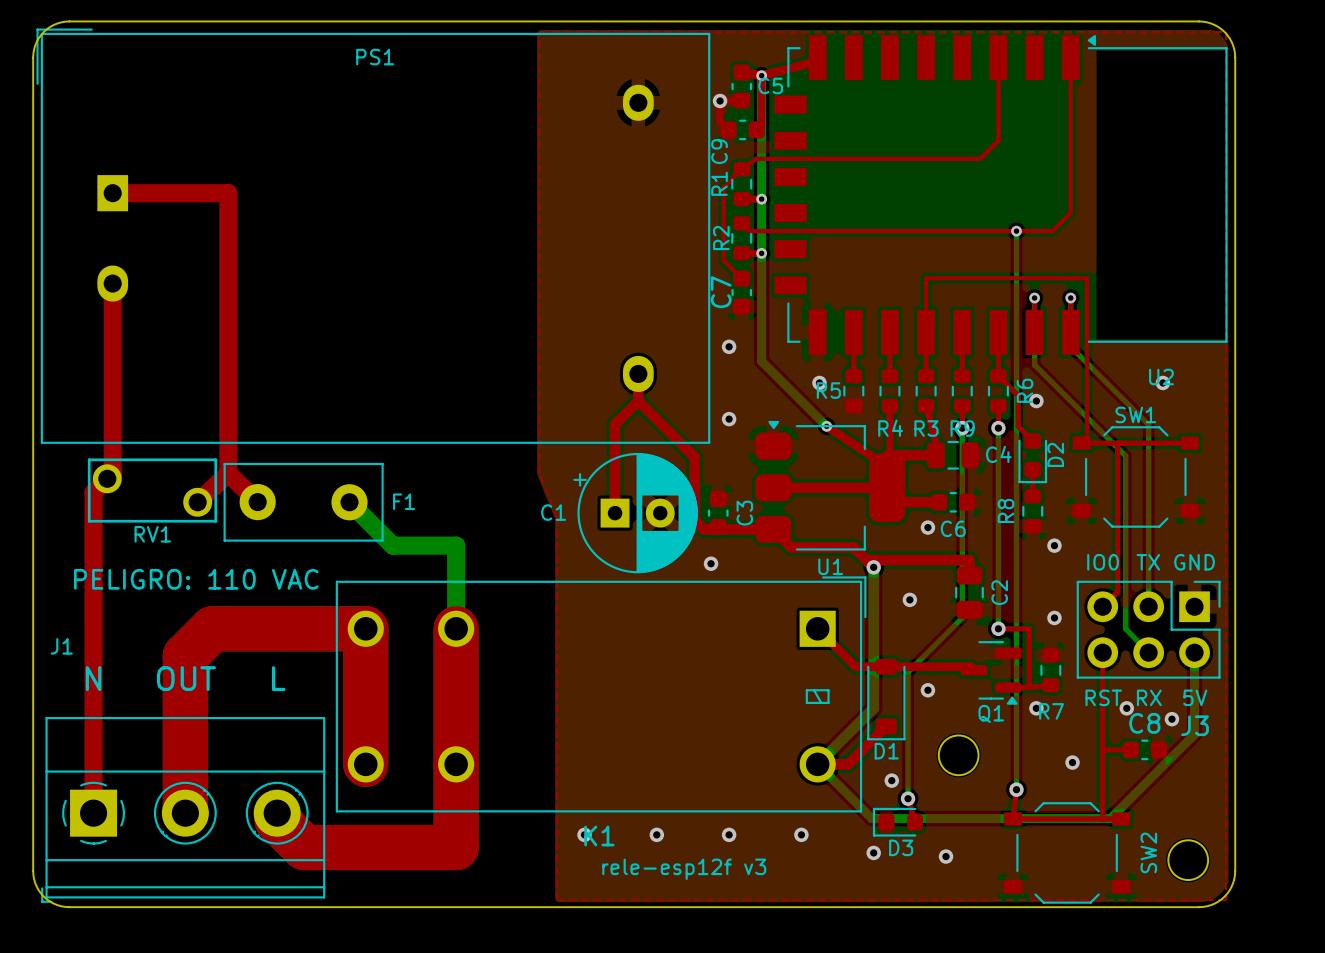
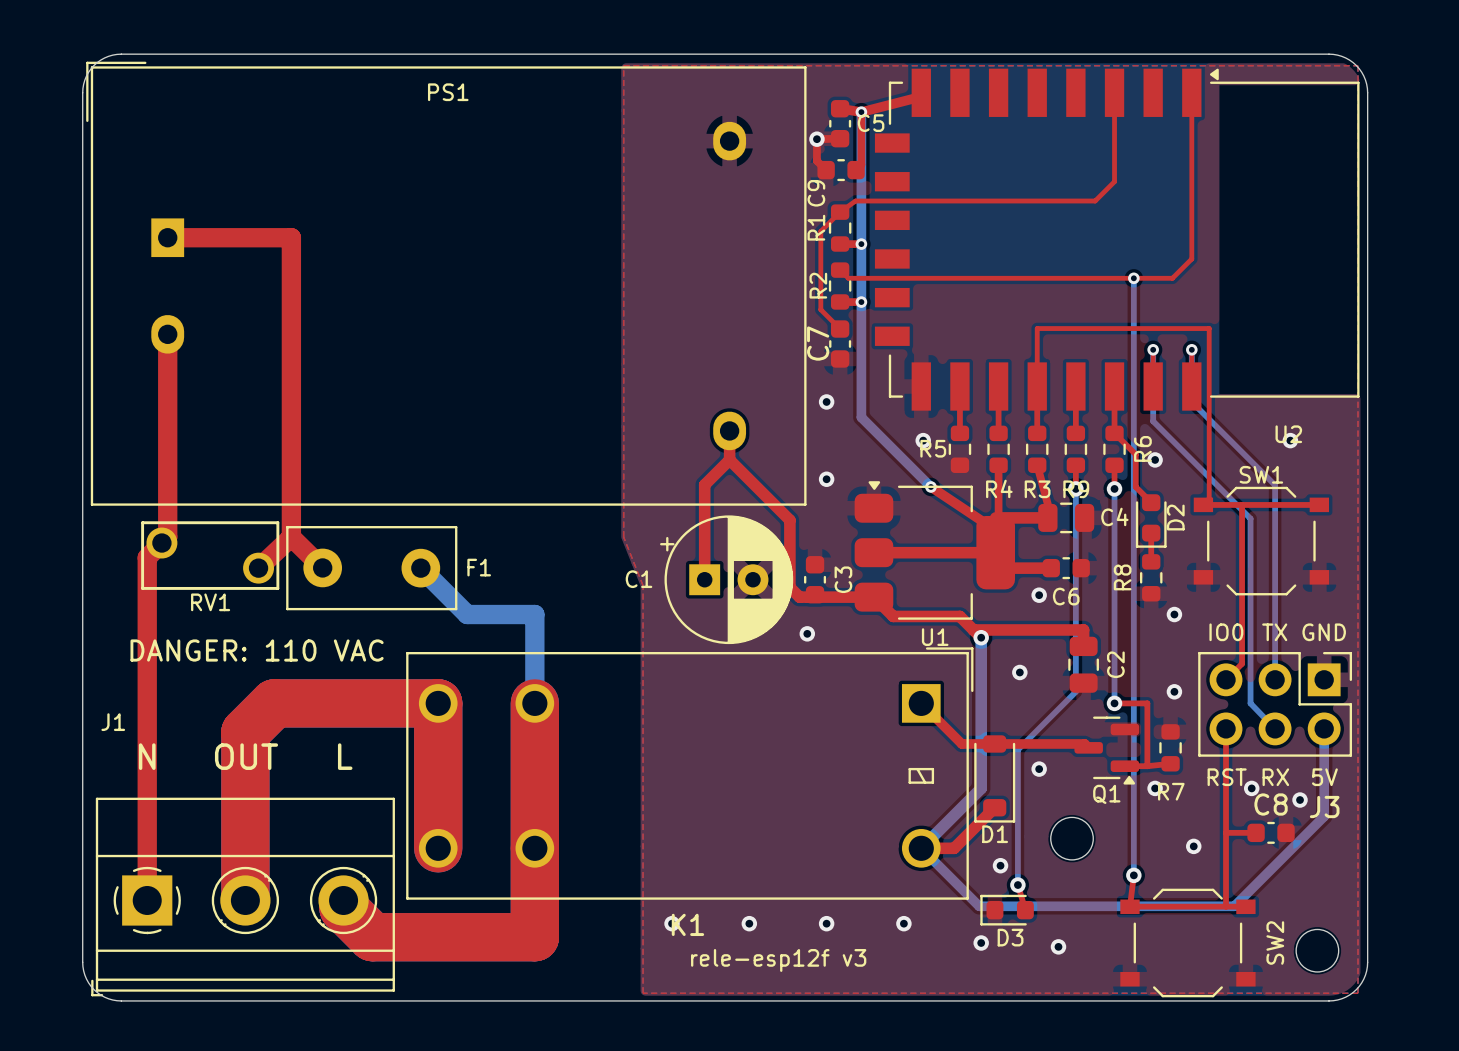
text: PELIGRO: 110 VAC (196, 579) -> DANGER: 110 VAC (257, 650)

